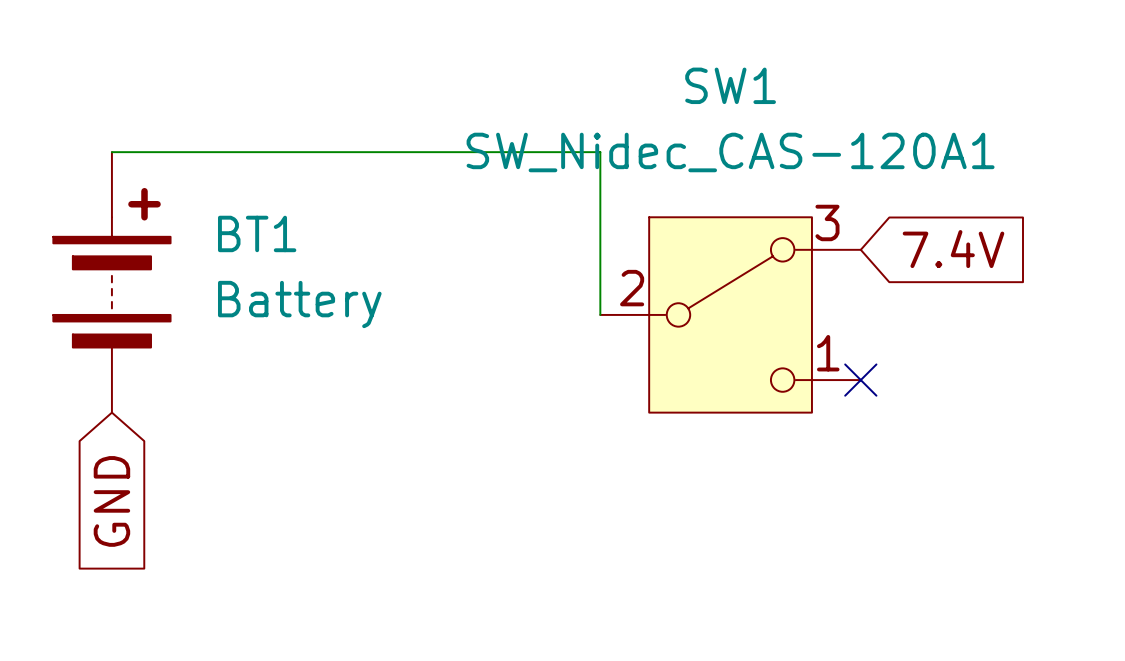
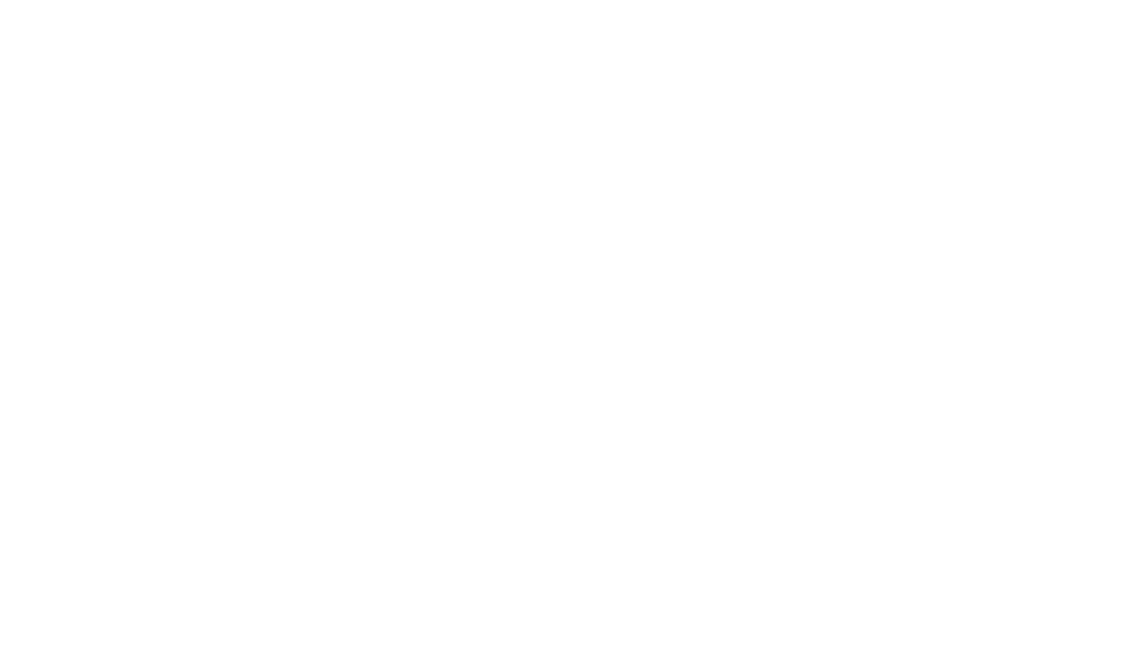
wire: (111, 152) (600, 152) (600, 314) -> none
global label: 7.4V (953, 249) -> none
BT1: Battery (111, 282) -> none
SW1: SW_Nidec_CAS-120A1 (730, 314) -> none
no-connect mark: (860, 380) -> none
global label: GND (111, 501) -> none

